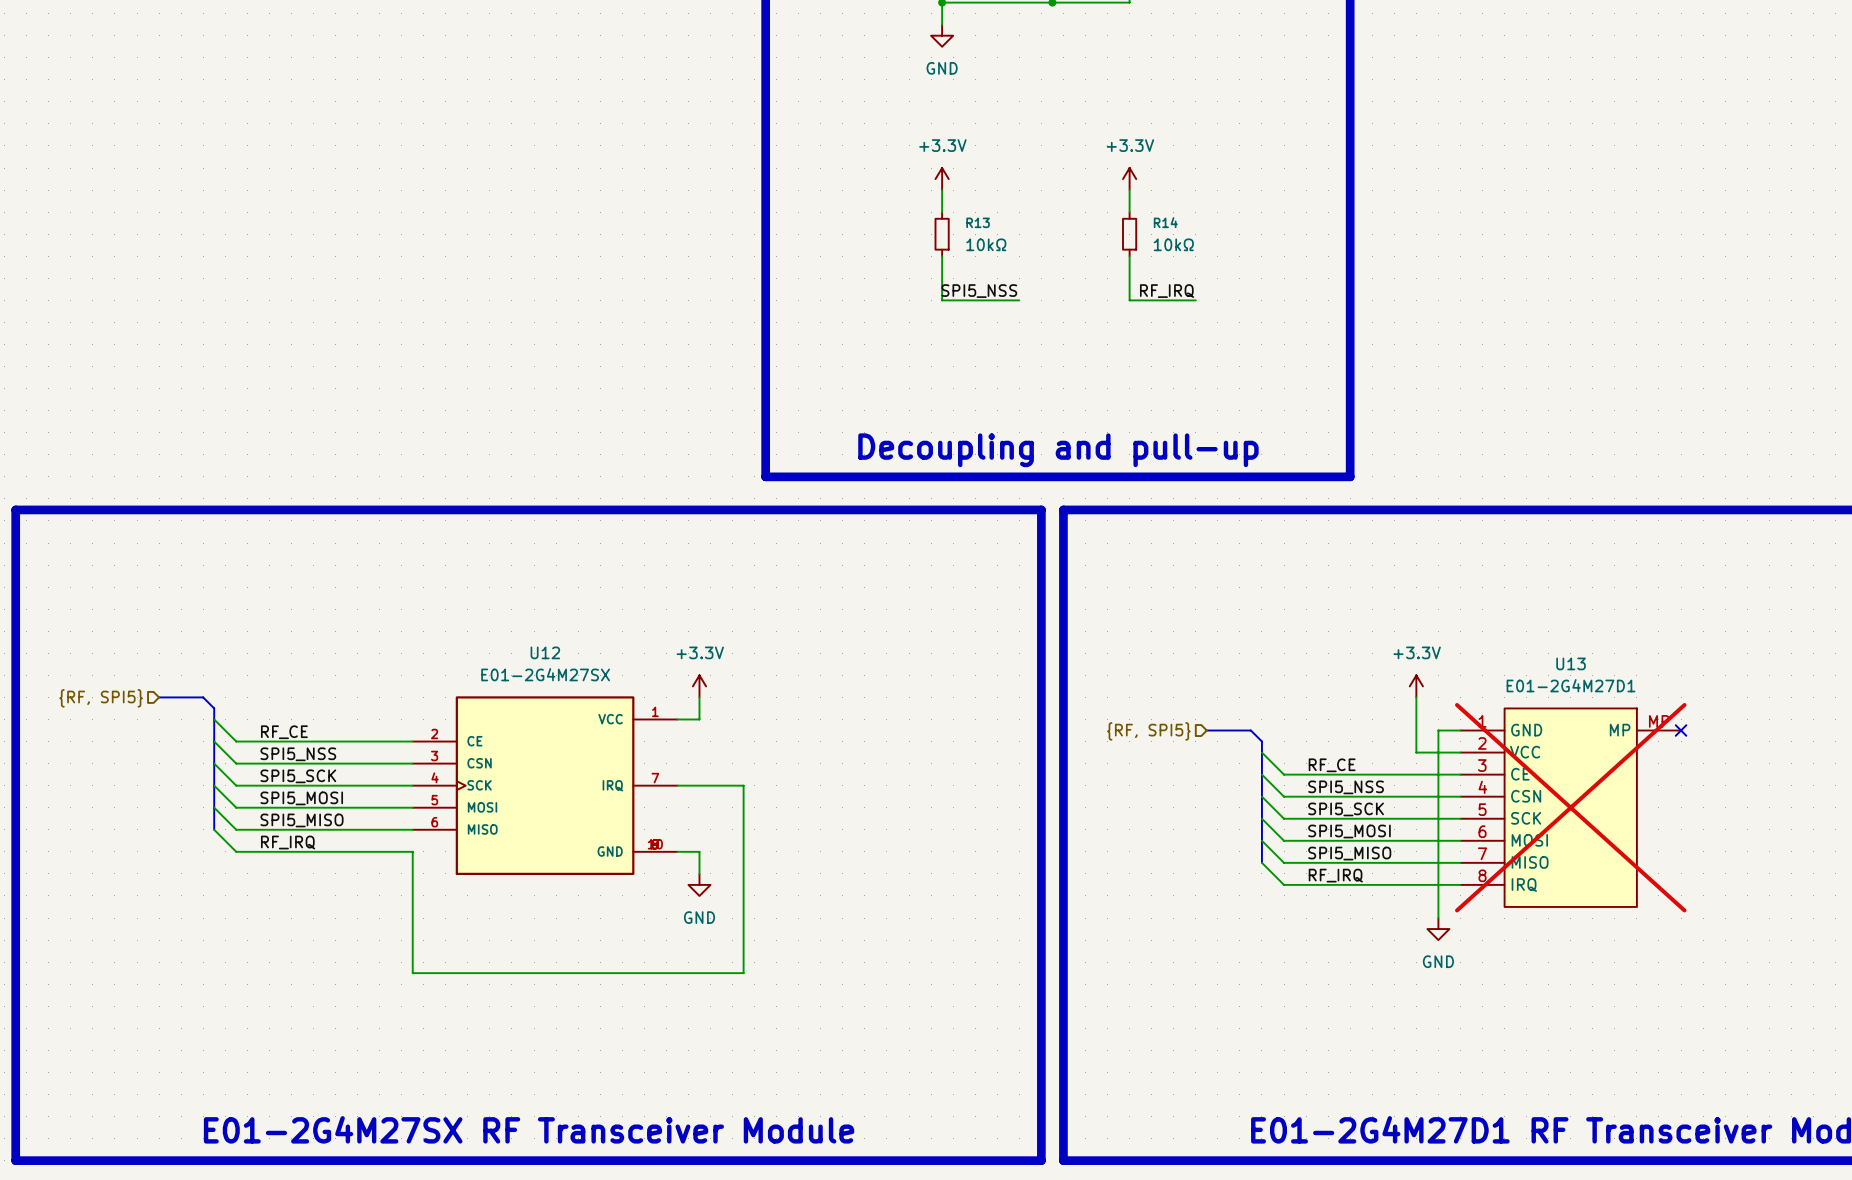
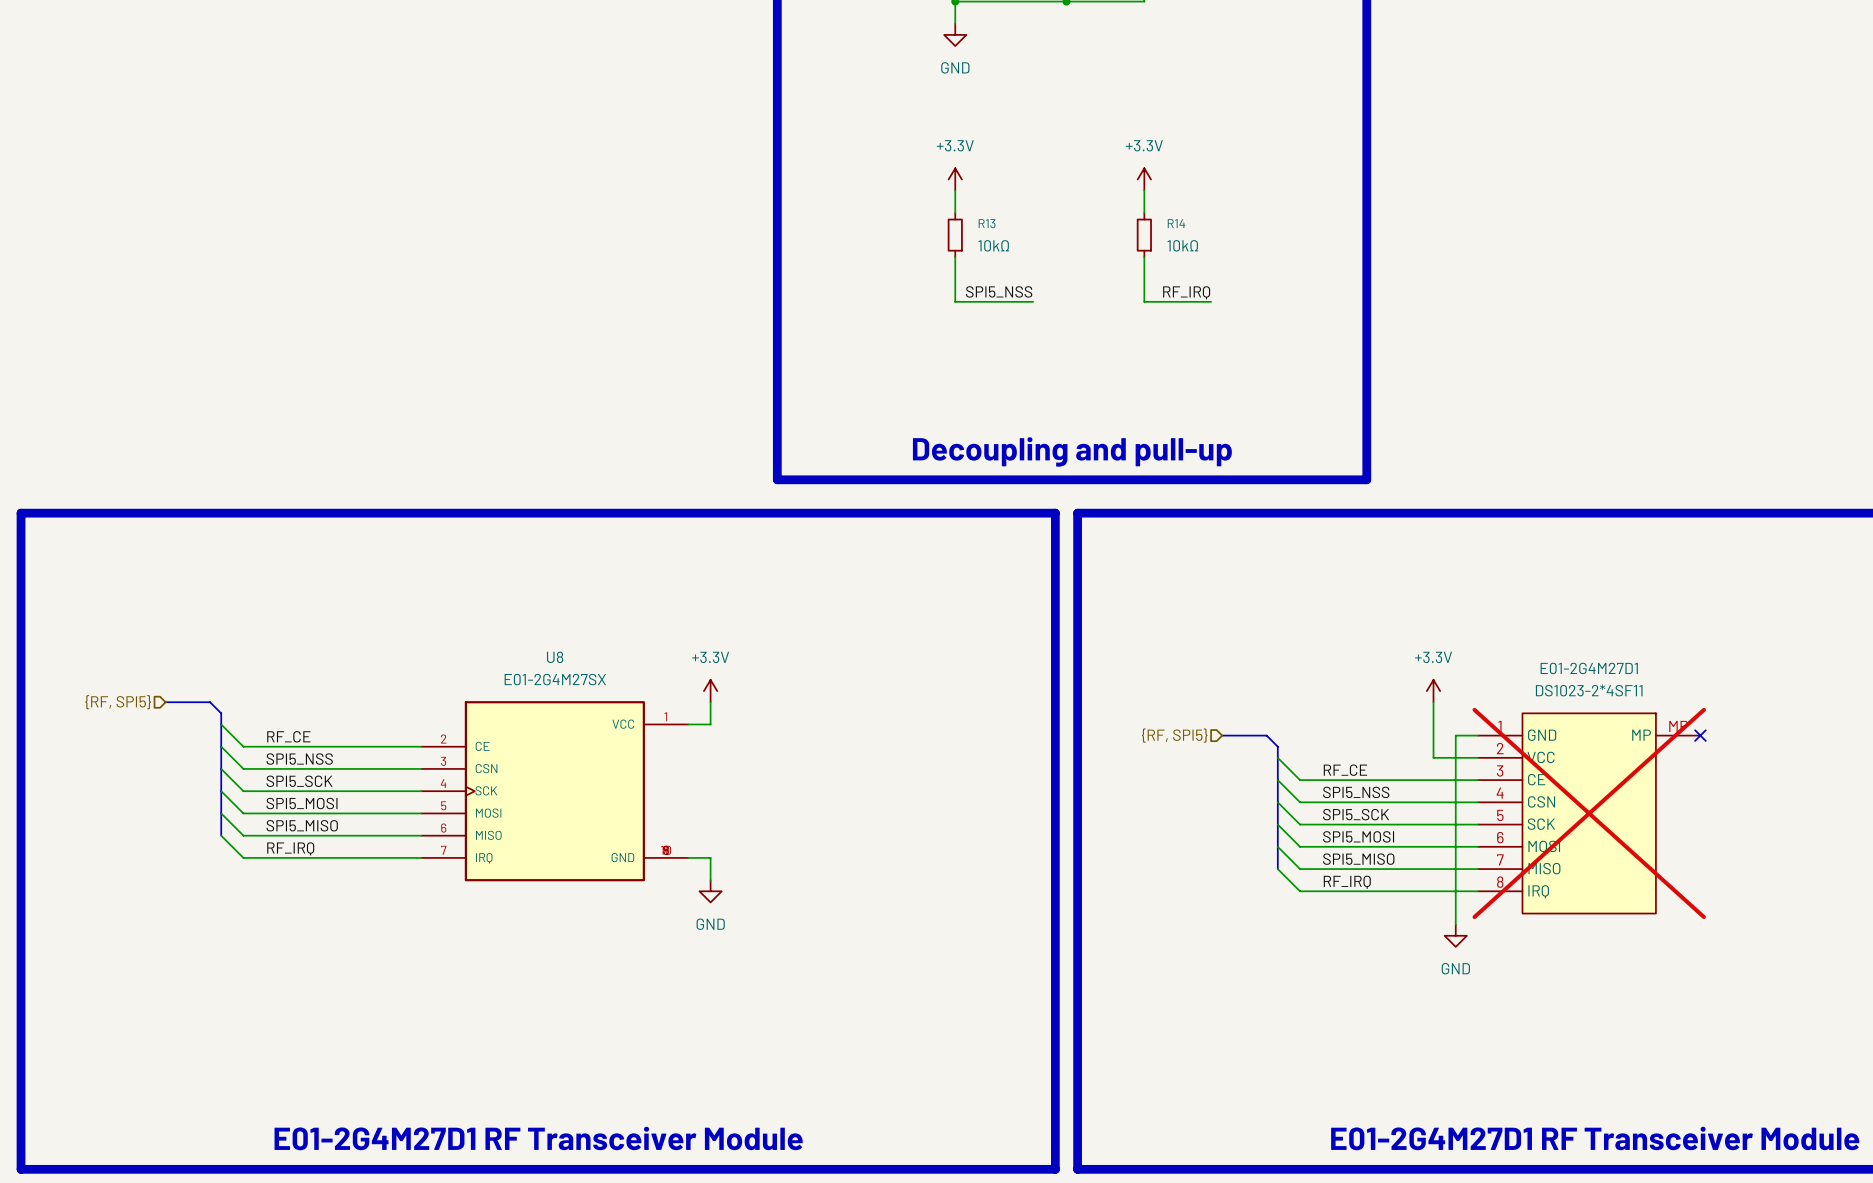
U13 name: U13 (1571, 663) -> E01-2G4M27D1 (1589, 668)
U13 value: E01-2G4M27D1 (1571, 685) -> DS1023-2*4SF11 (1589, 690)
U12: E01-2G4M27SX (545, 785) -> none
U8: none -> E01-2G4M27SX (554, 791)
wire: (677, 785) (743, 785) (743, 973) (412, 973) (412, 851) -> none
text: E01-2G4M27SX RF Transceiver Module (529, 1129) -> E01-2G4M27D1 RF Transceiver Module (538, 1138)

